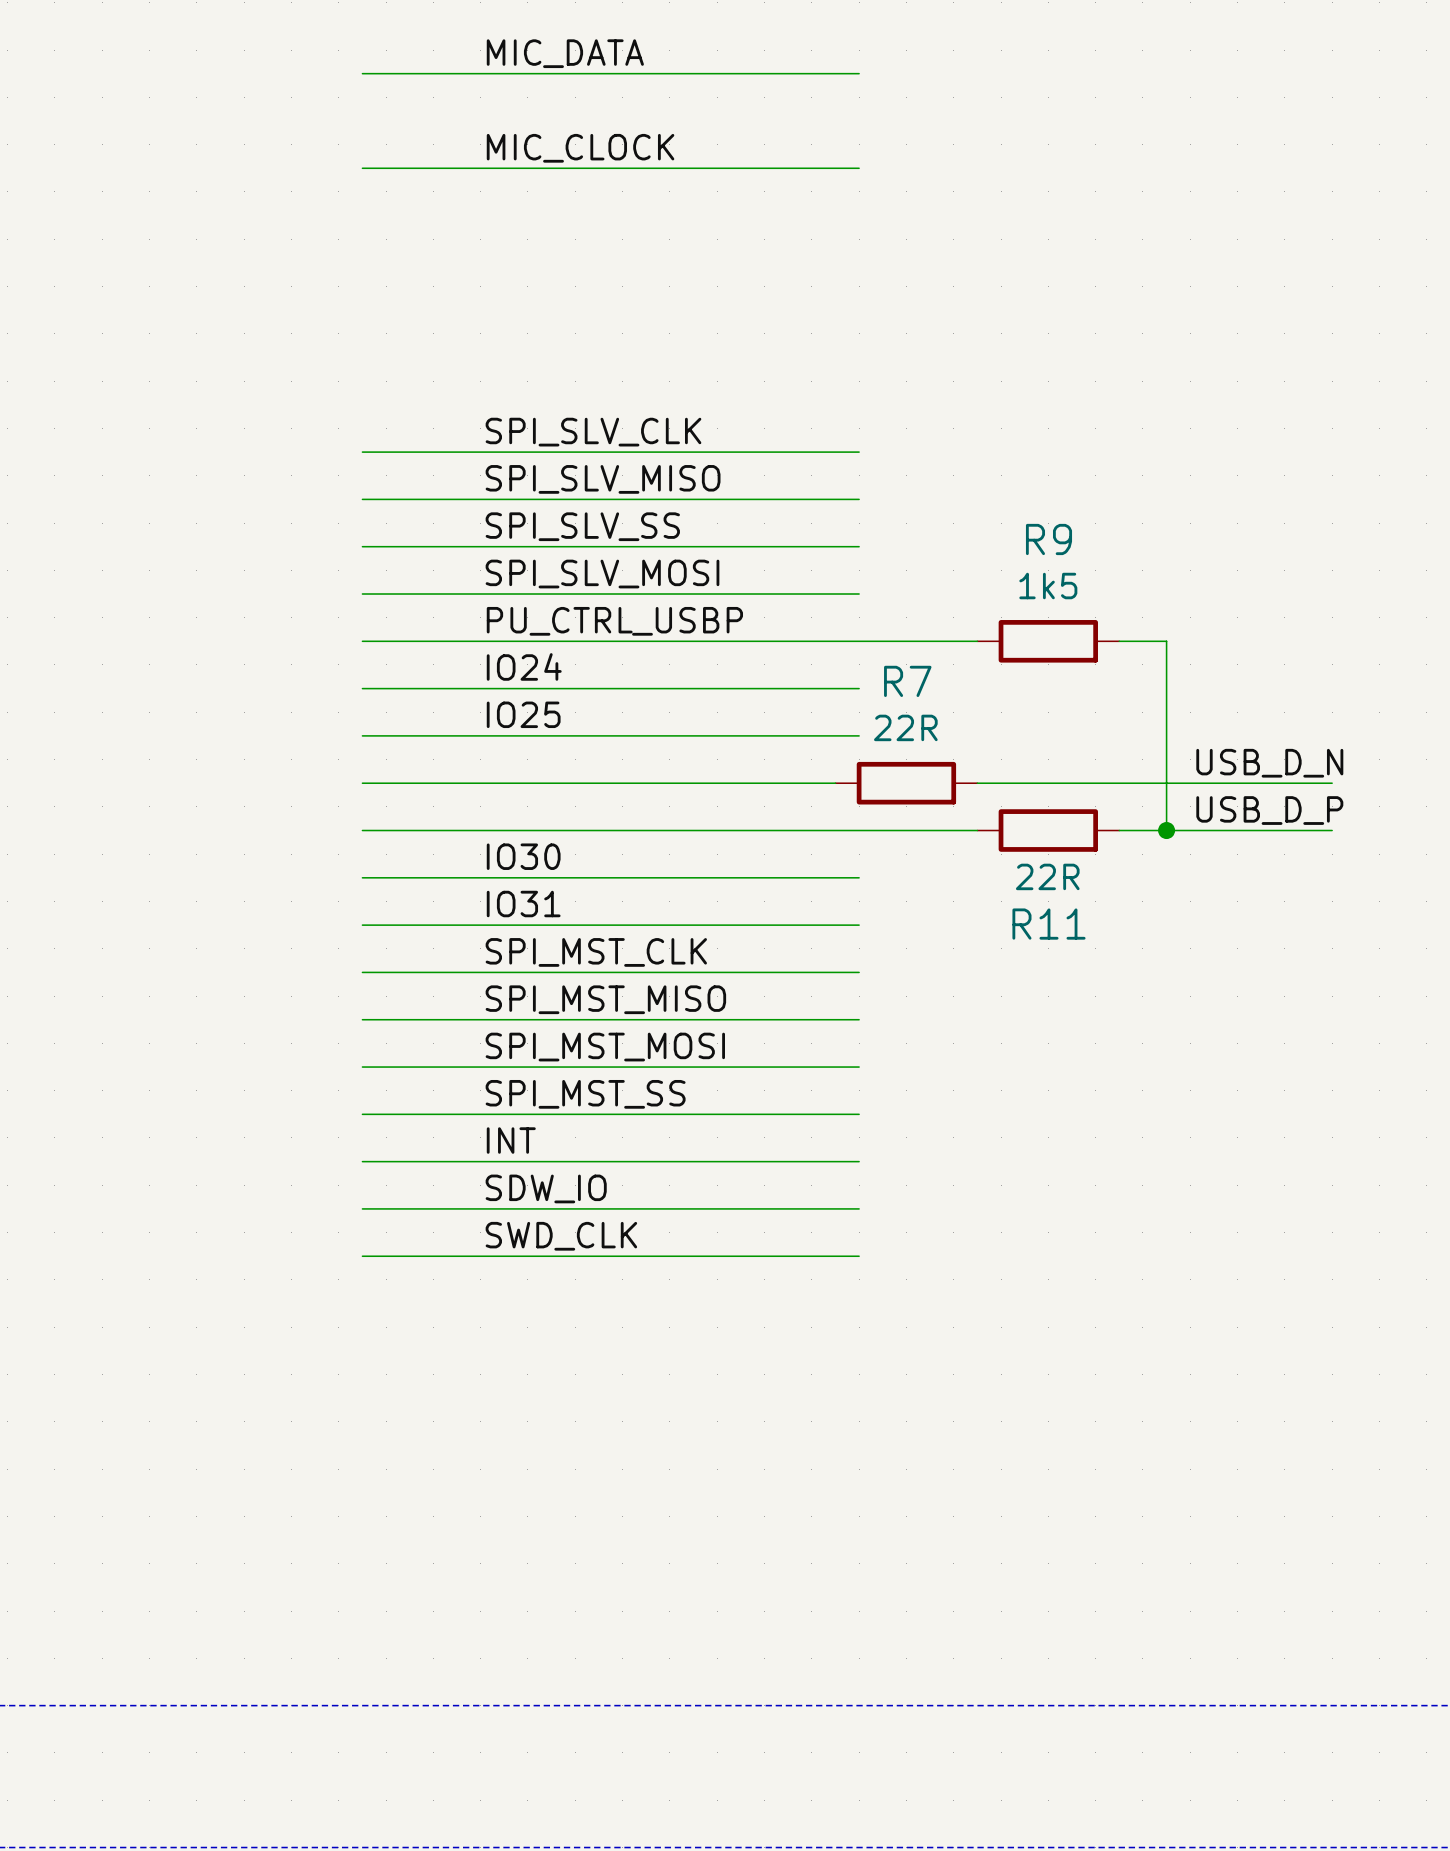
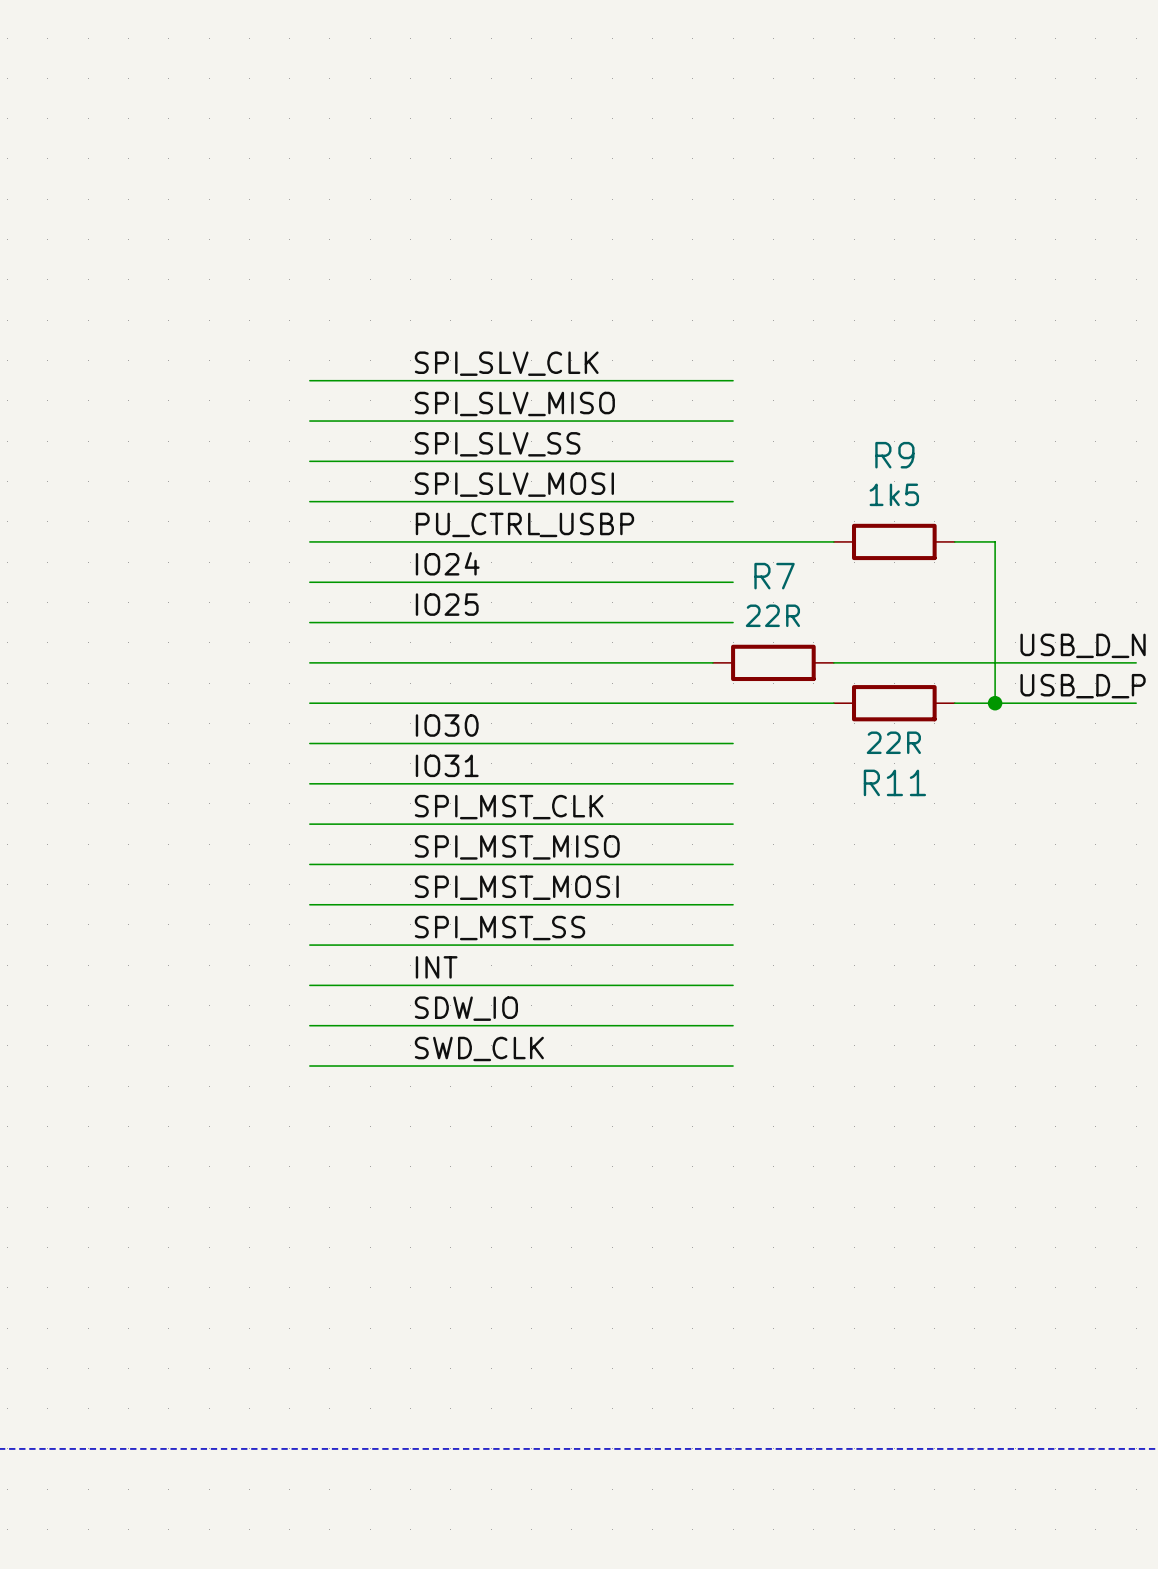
label: MIC_DATA (565, 53) -> none
wire: (362, 73) (859, 73) -> none
label: MIC_CLOCK (580, 148) -> none
wire: (362, 168) (859, 168) -> none

